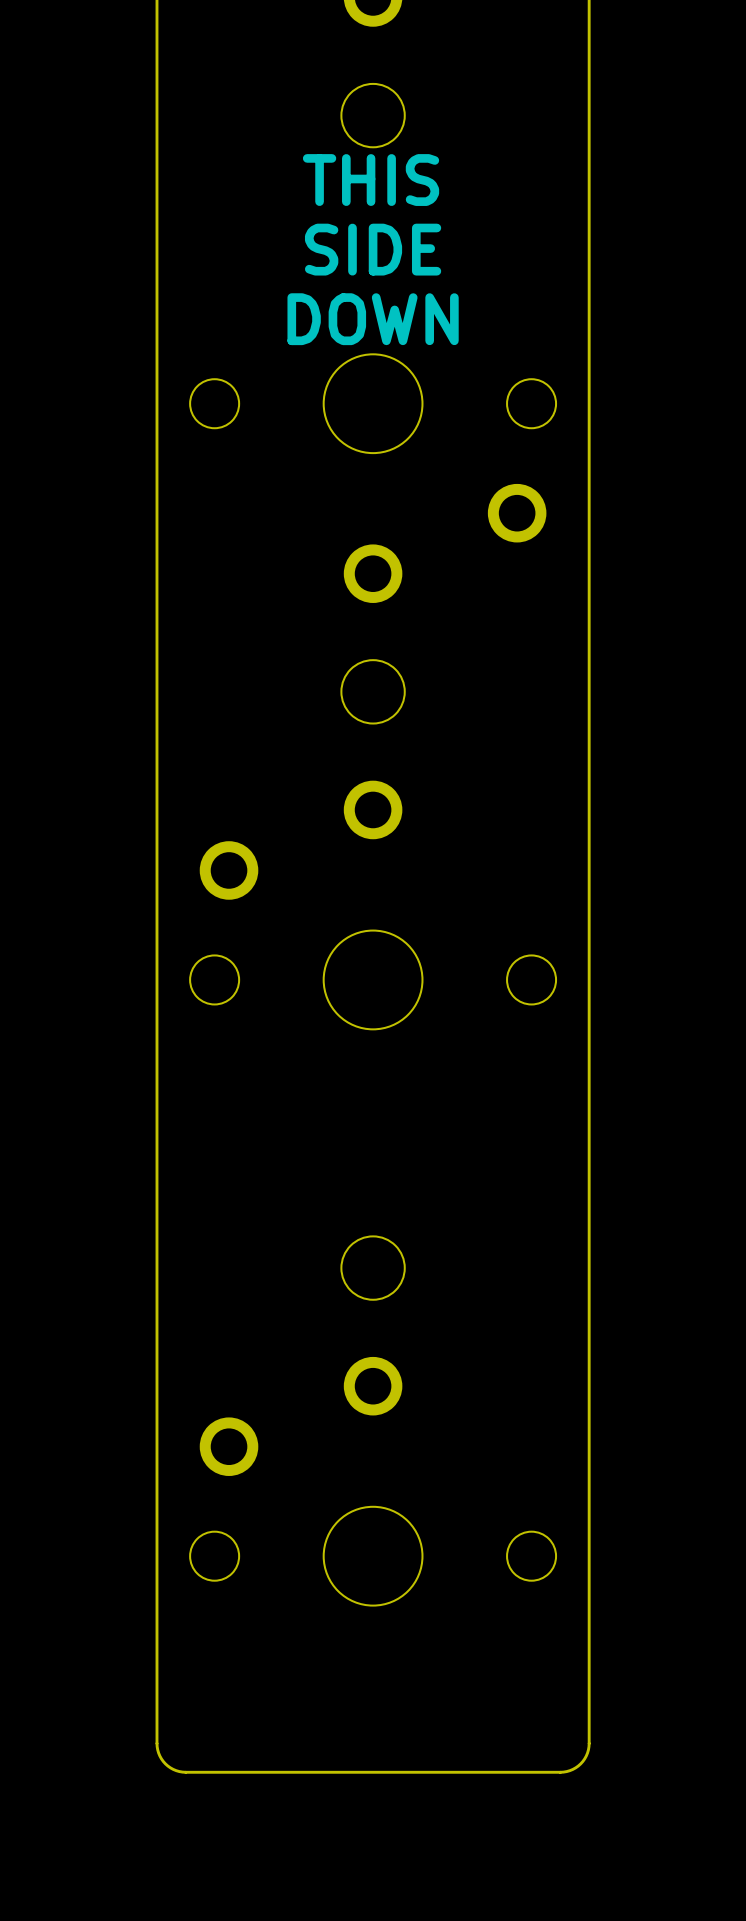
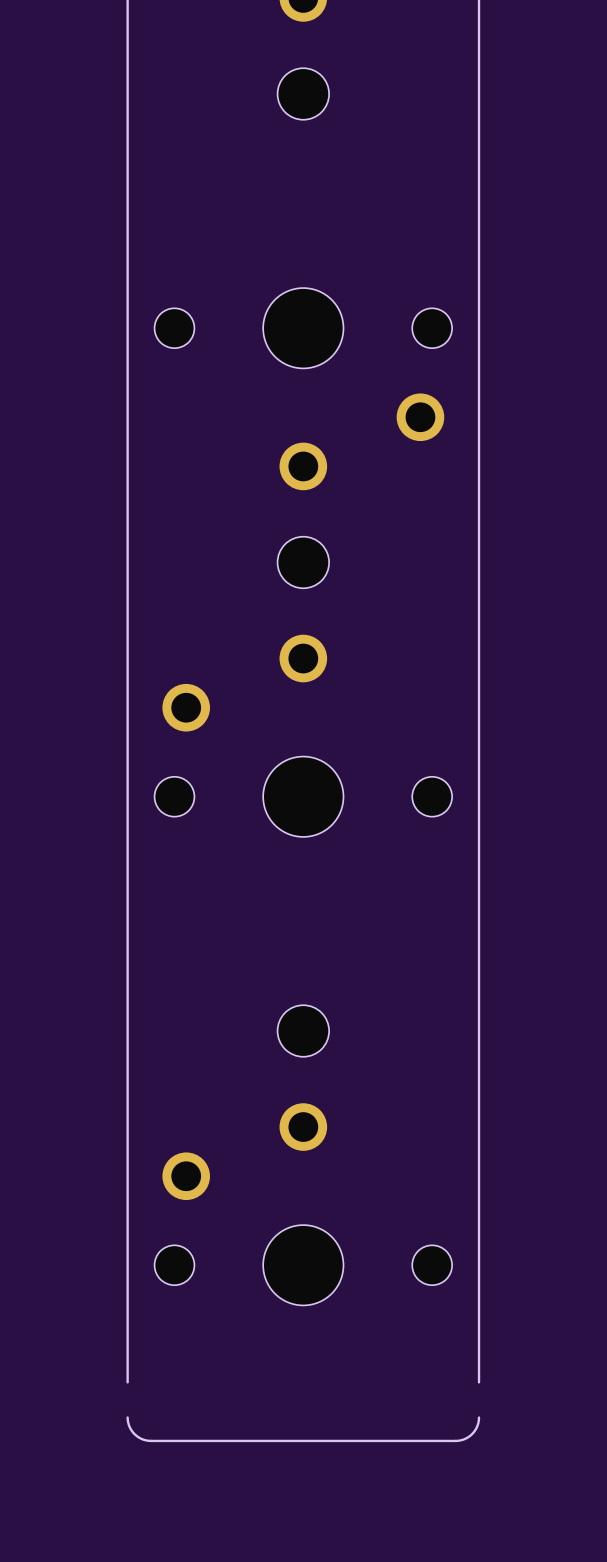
text: THIS (371, 180) -> none
text: SIDE (373, 249) -> none
text: DOWN (373, 319) -> none
board edge: (156, 1700) (156, 1743) -> none
board edge: (589, 1700) (589, 1743) -> none

